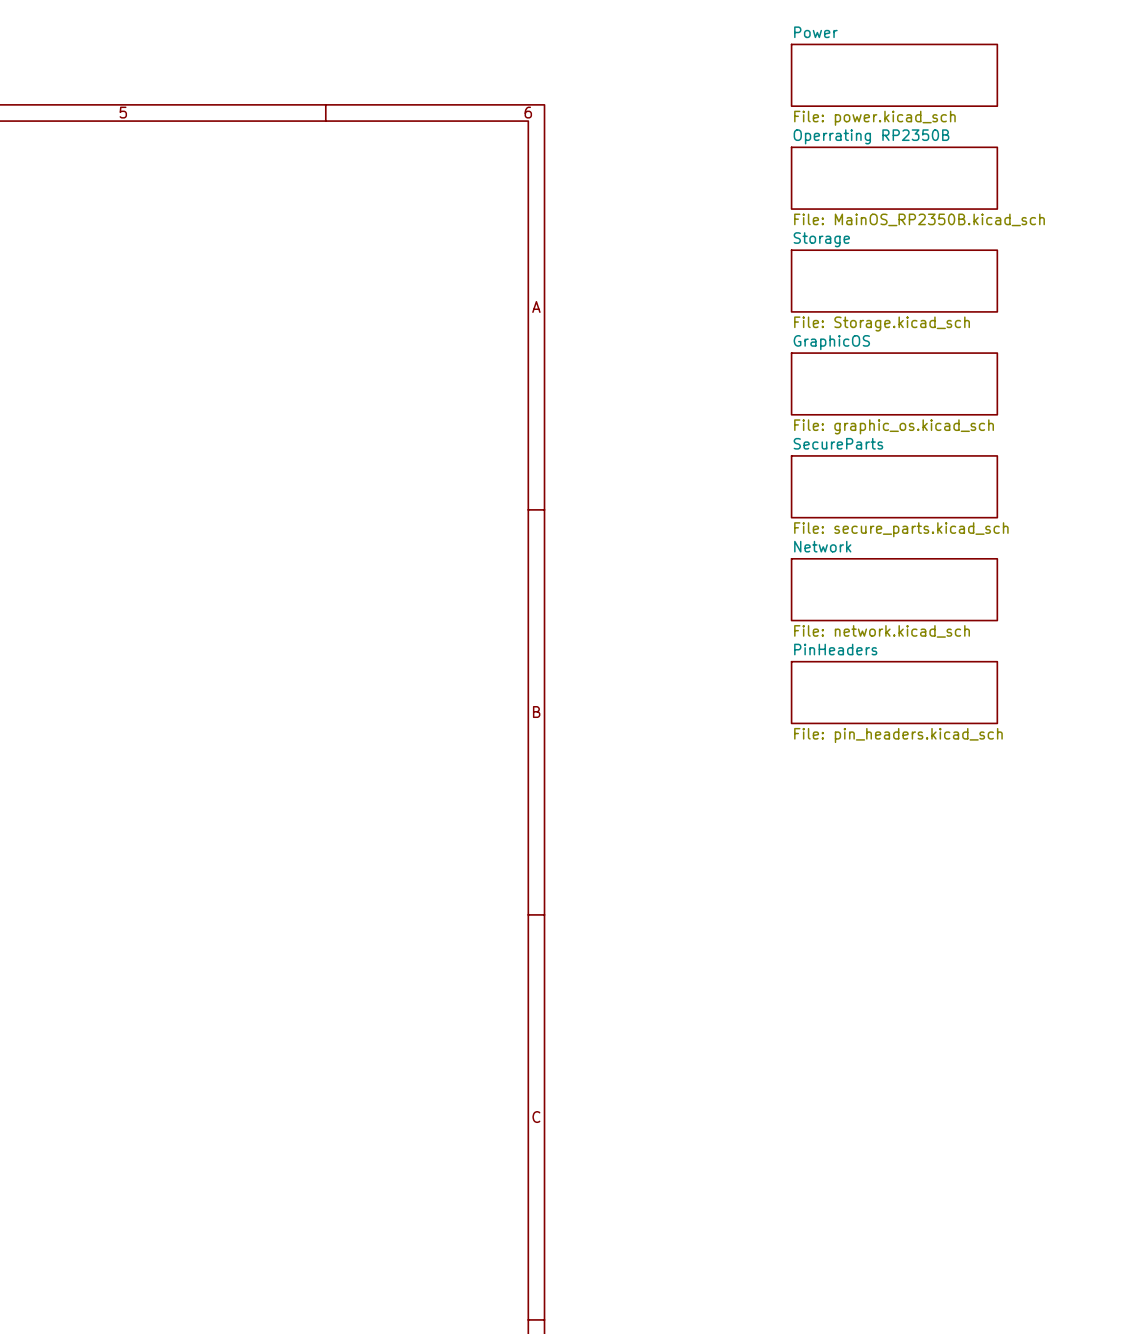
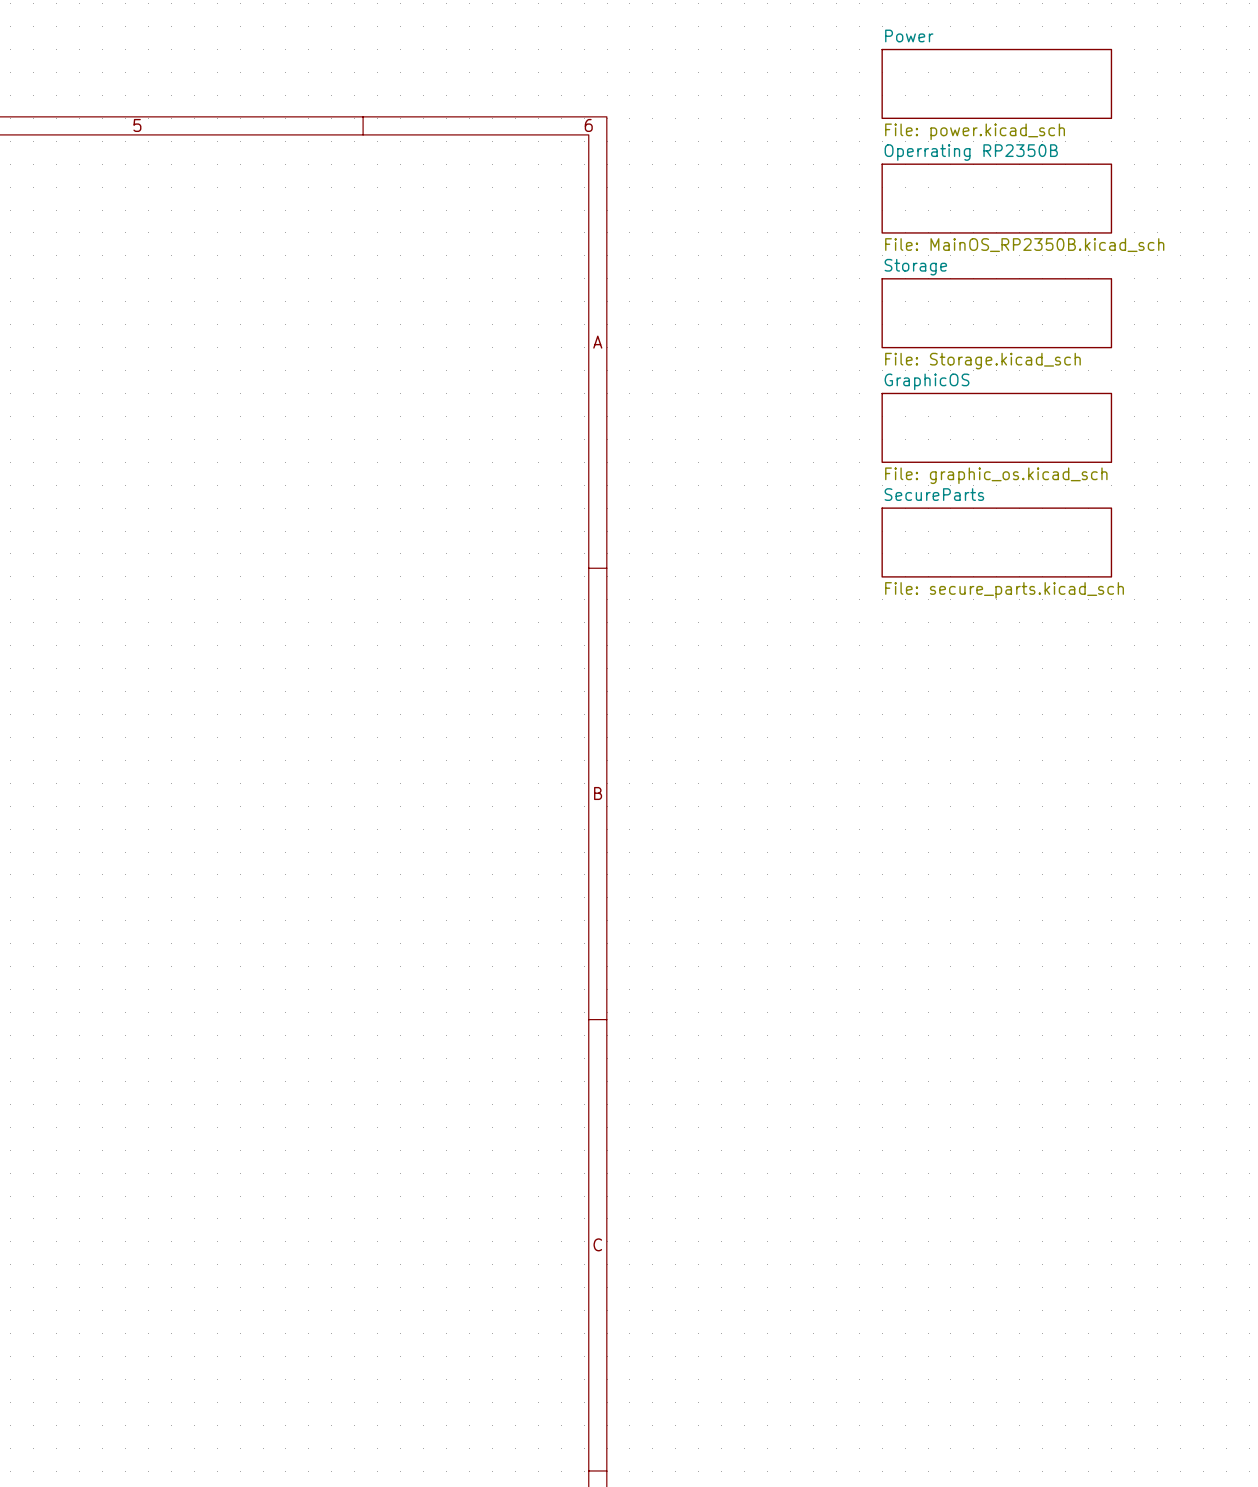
sheet Network: File: network.kicad_sch (894, 589) -> none
sheet PinHeaders: File: pin_headers.kicad_sch (894, 692) -> none

